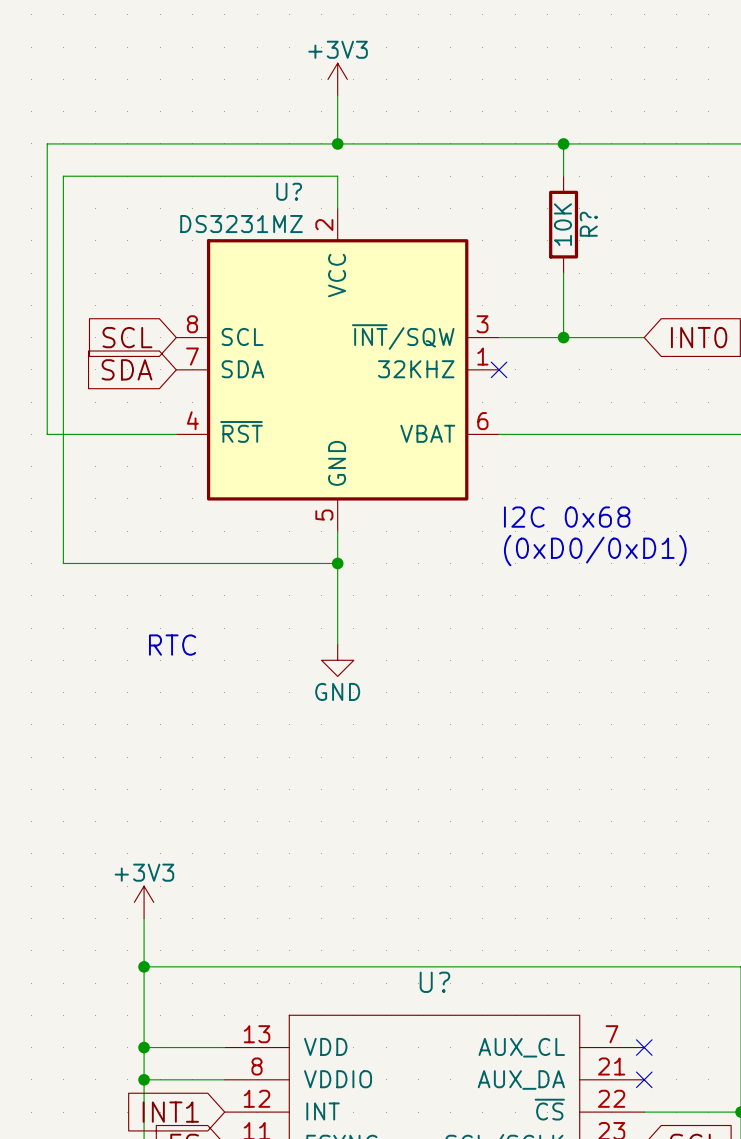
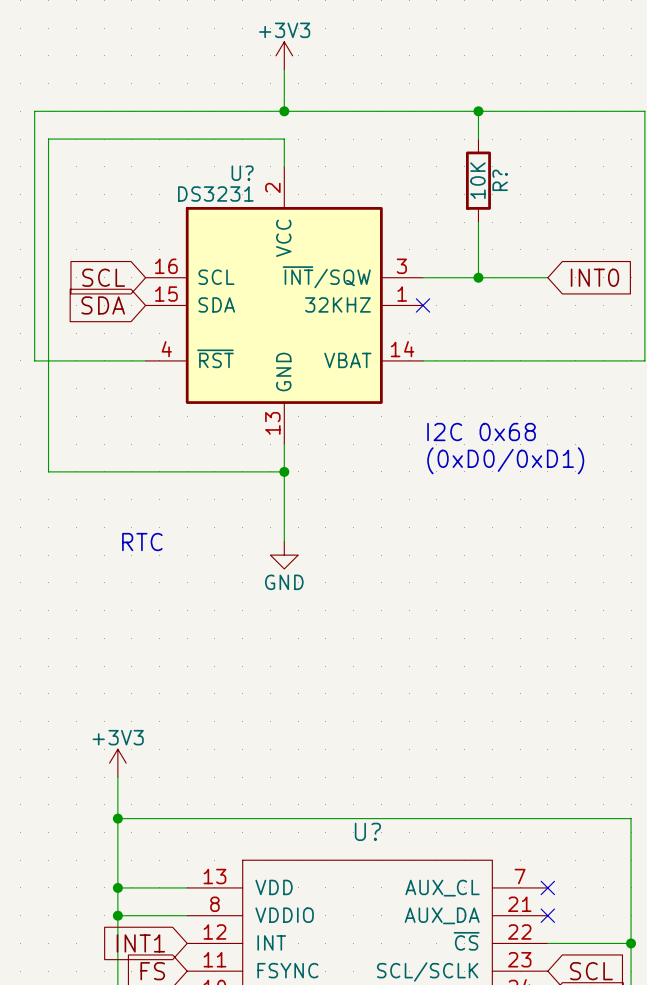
U? symbol: [176, 208, 500, 532] -> [145, 166, 423, 445]
U? value: DS3231MZ (241, 224) -> DS3231 (215, 194)

